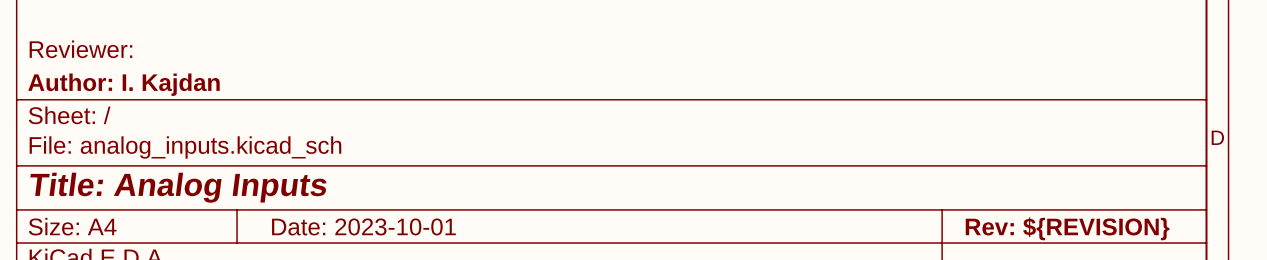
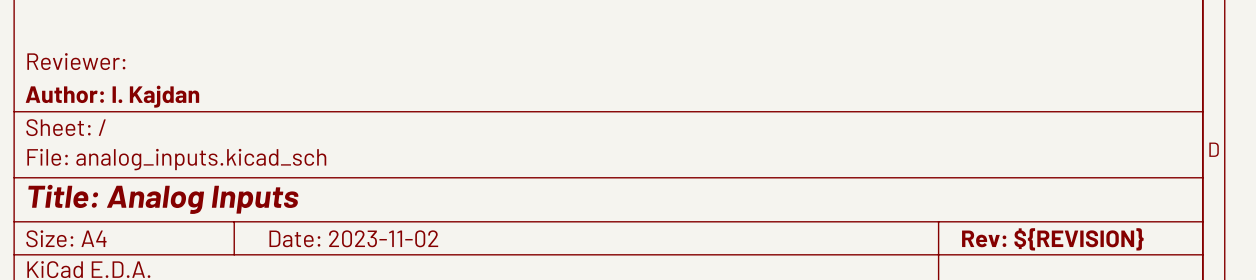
title block: Date: 2023-10-01 (363, 226) -> Date: 2023-11-02 (353, 238)

